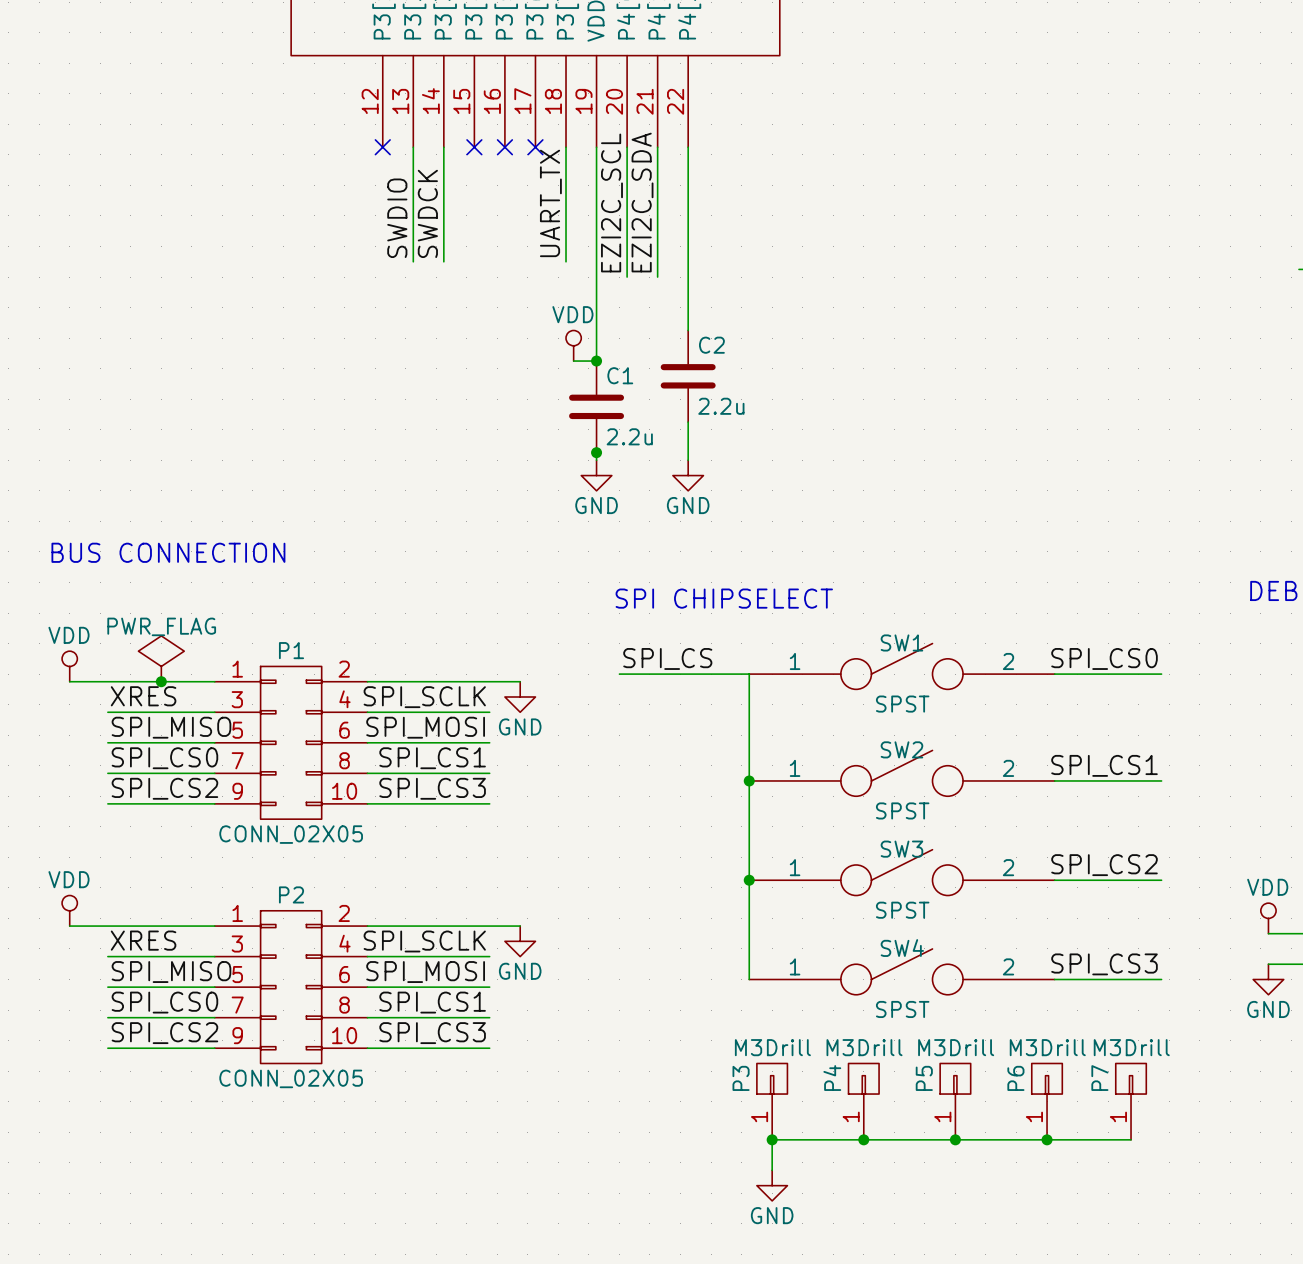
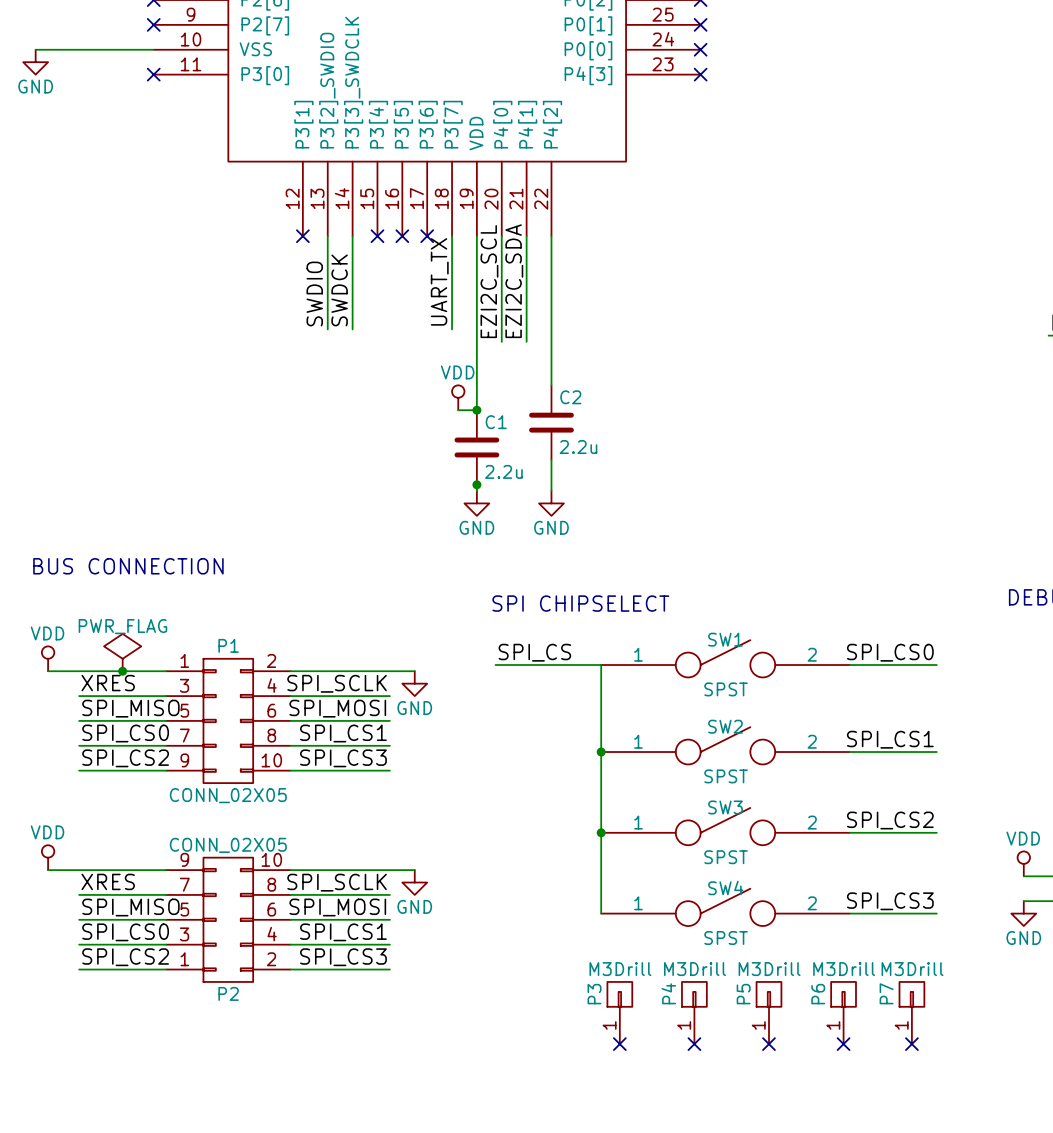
P2 flip: as is (291, 987) -> up-down (228, 919)
junction: (772, 1139) -> none
no-connect mark: none -> (619, 1044)
junction: (863, 1139) -> none
no-connect mark: none -> (694, 1044)
junction: (955, 1139) -> none
no-connect mark: none -> (768, 1044)
junction: (1047, 1139) -> none
no-connect mark: none -> (843, 1044)
wire: (1131, 1139) (772, 1139) (772, 1170) -> none
no-connect mark: none -> (911, 1044)
power symbol: GND (772, 1185) -> none

